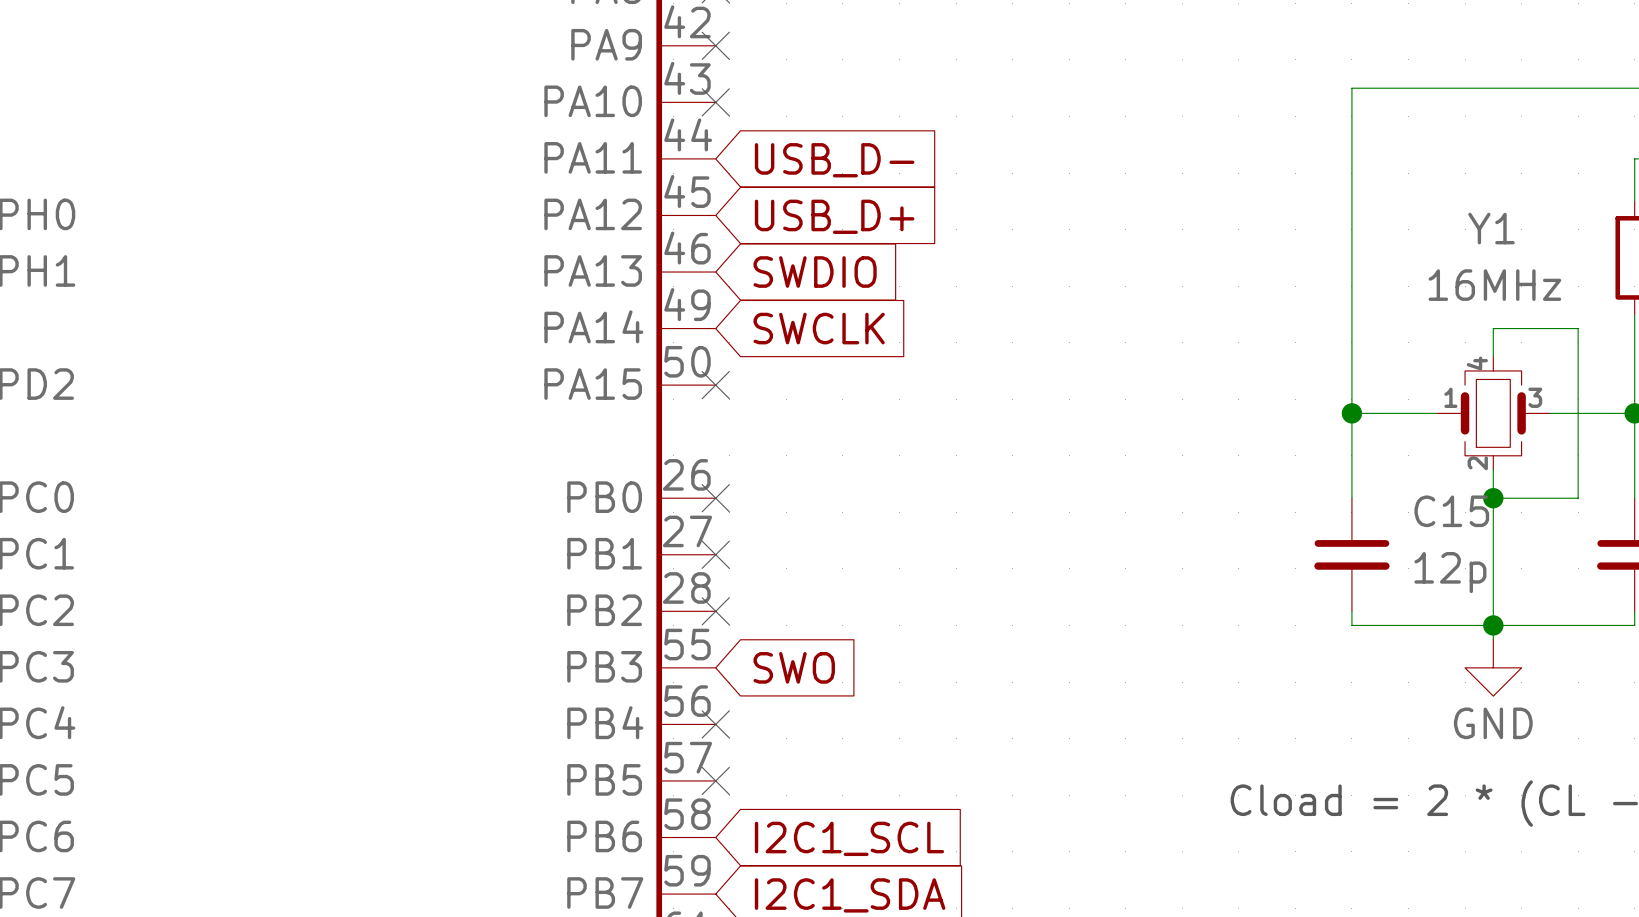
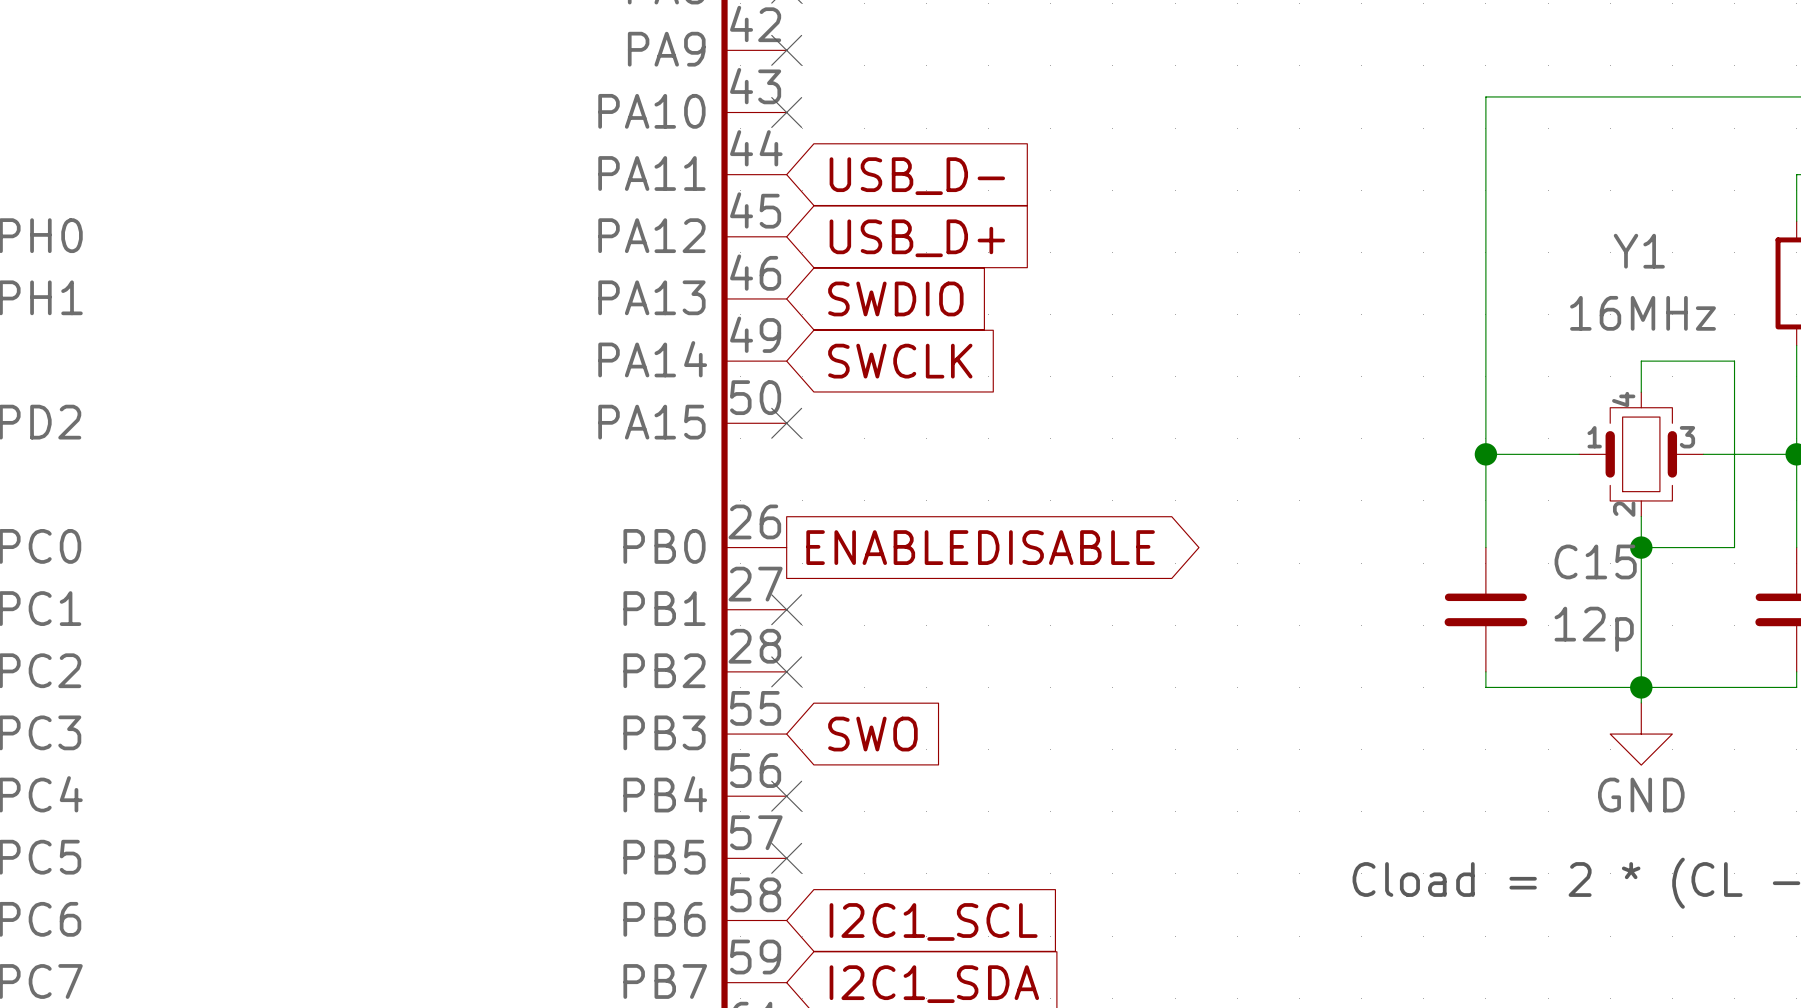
no-connect mark: (715, 498) -> none
global label: none -> ENABLEDISABLE (980, 547)

